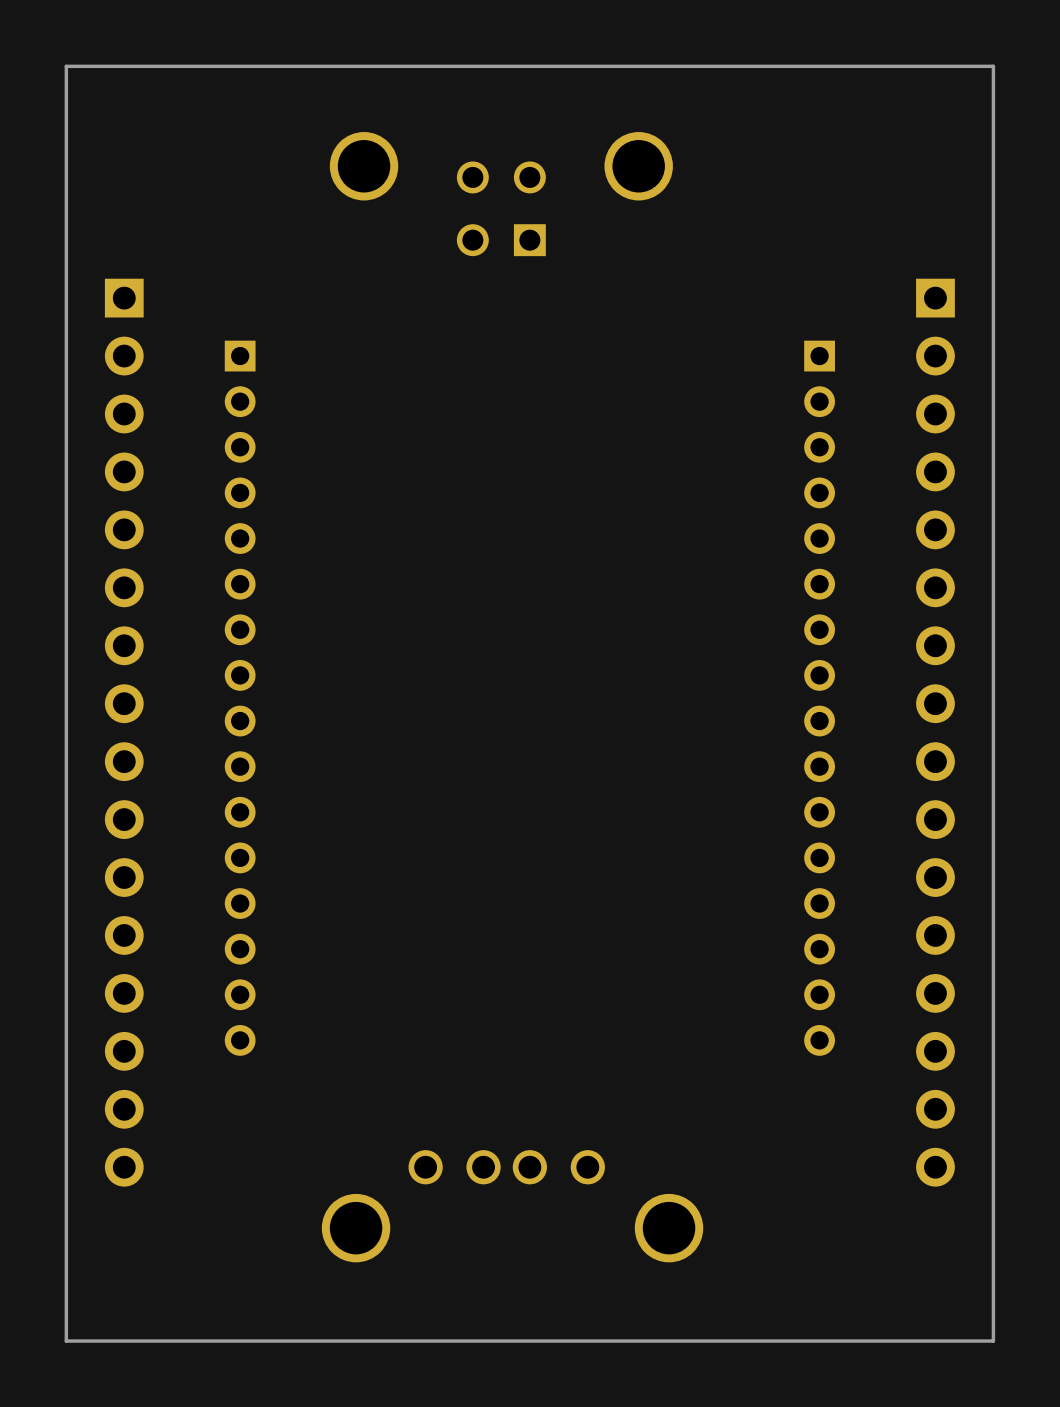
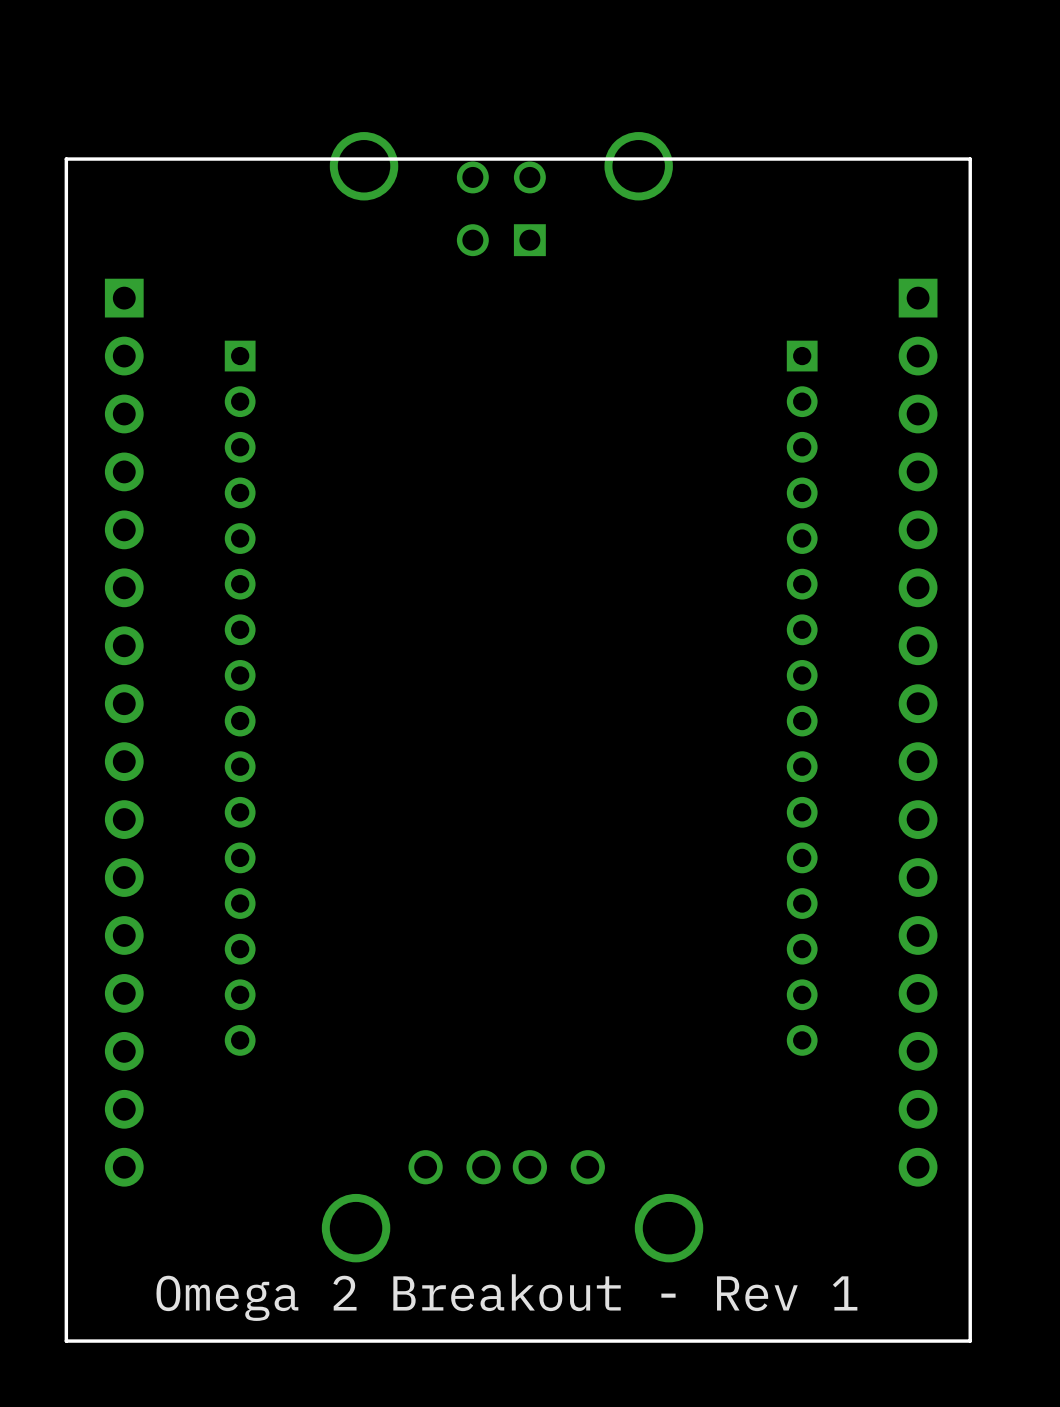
board edge: (66, 159) (66, 66) (993, 66) (993, 1341) (970, 1341) -> (66, 159) (970, 159) (970, 1341)
part position: (819, 698) -> (802, 698)
part position: (935, 732) -> (918, 732)
text: none -> Omega 2 Breakout - Rev 1 (506, 1297)

